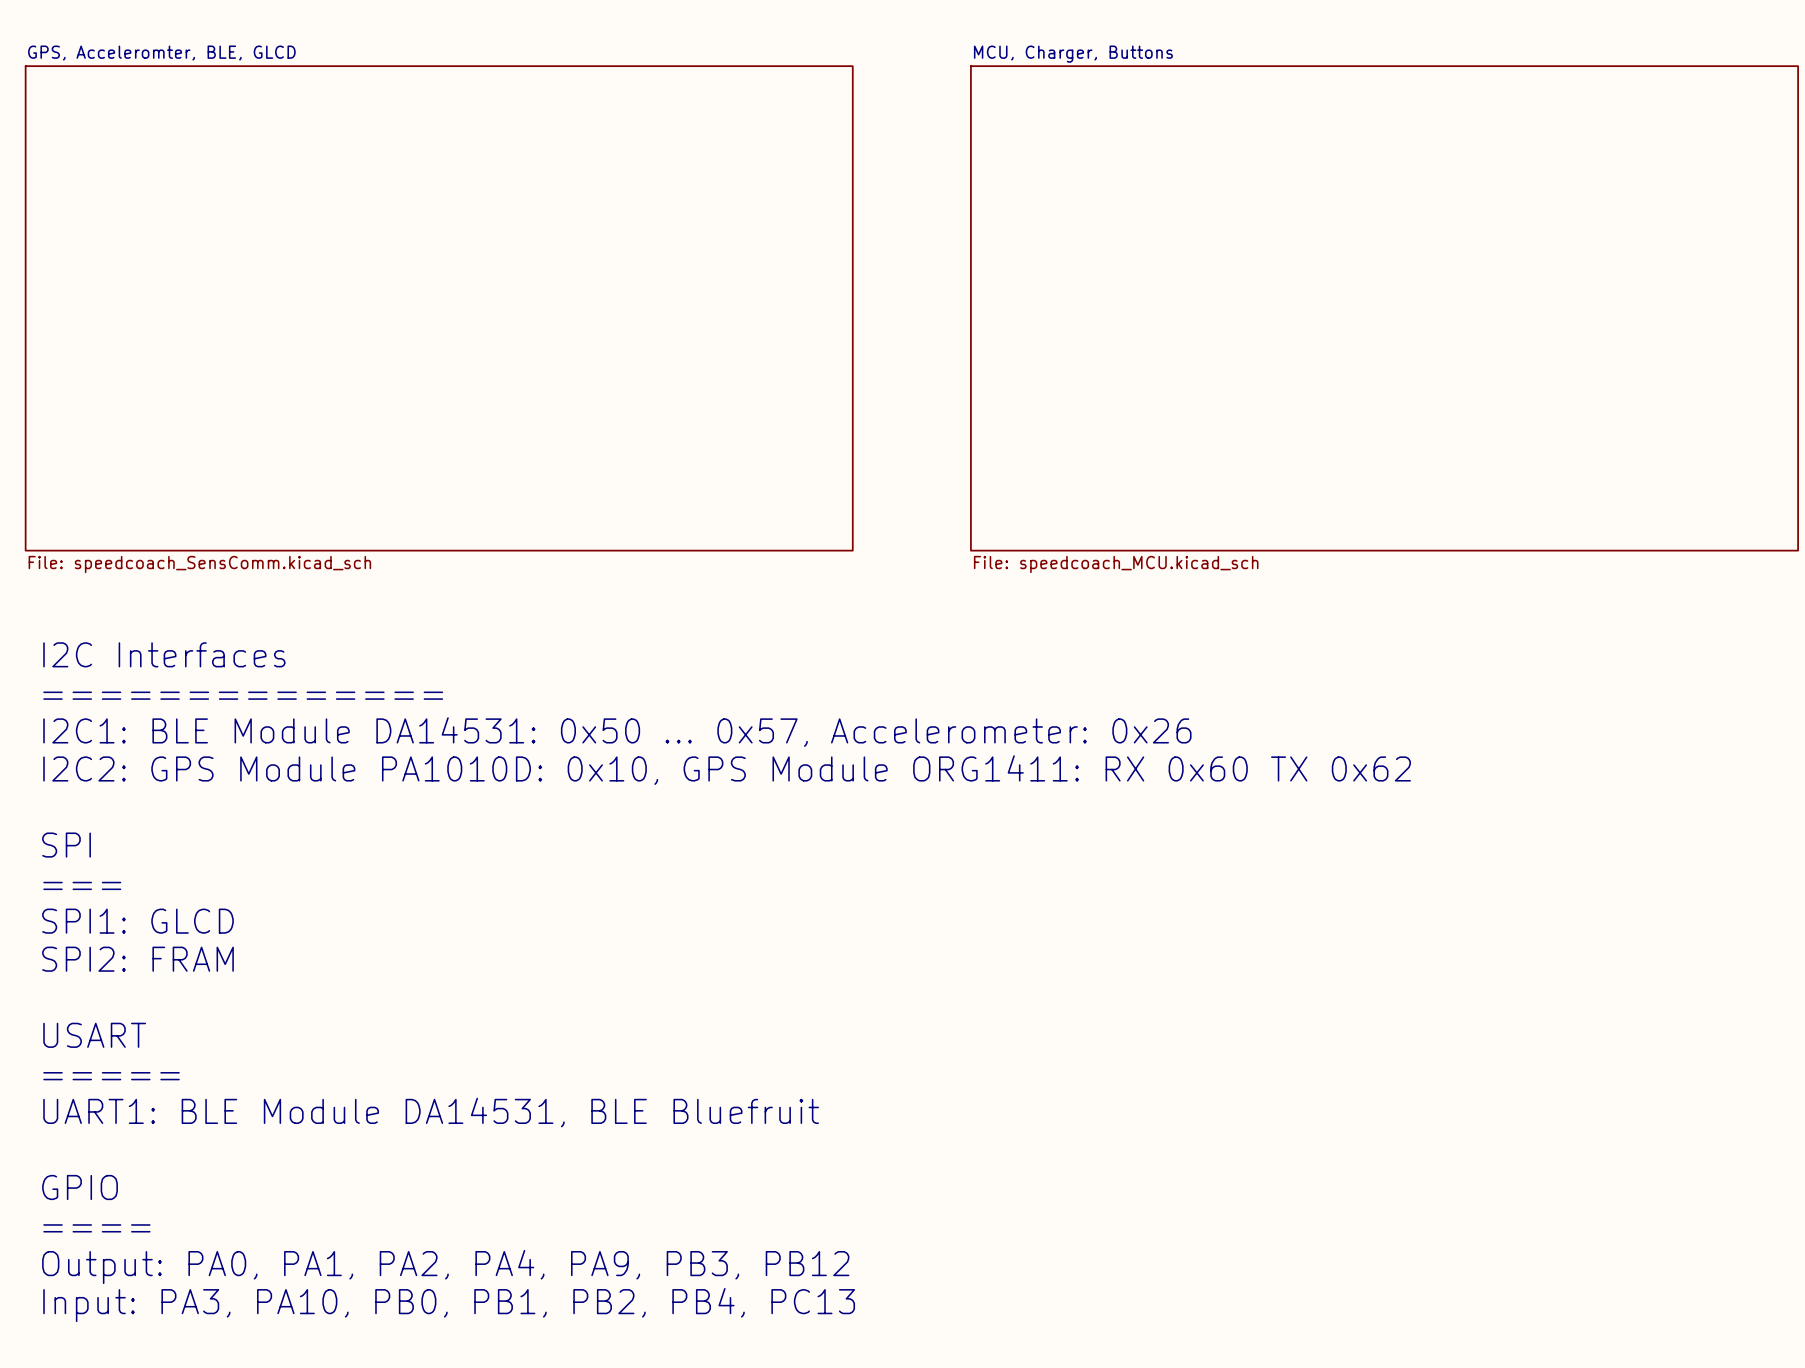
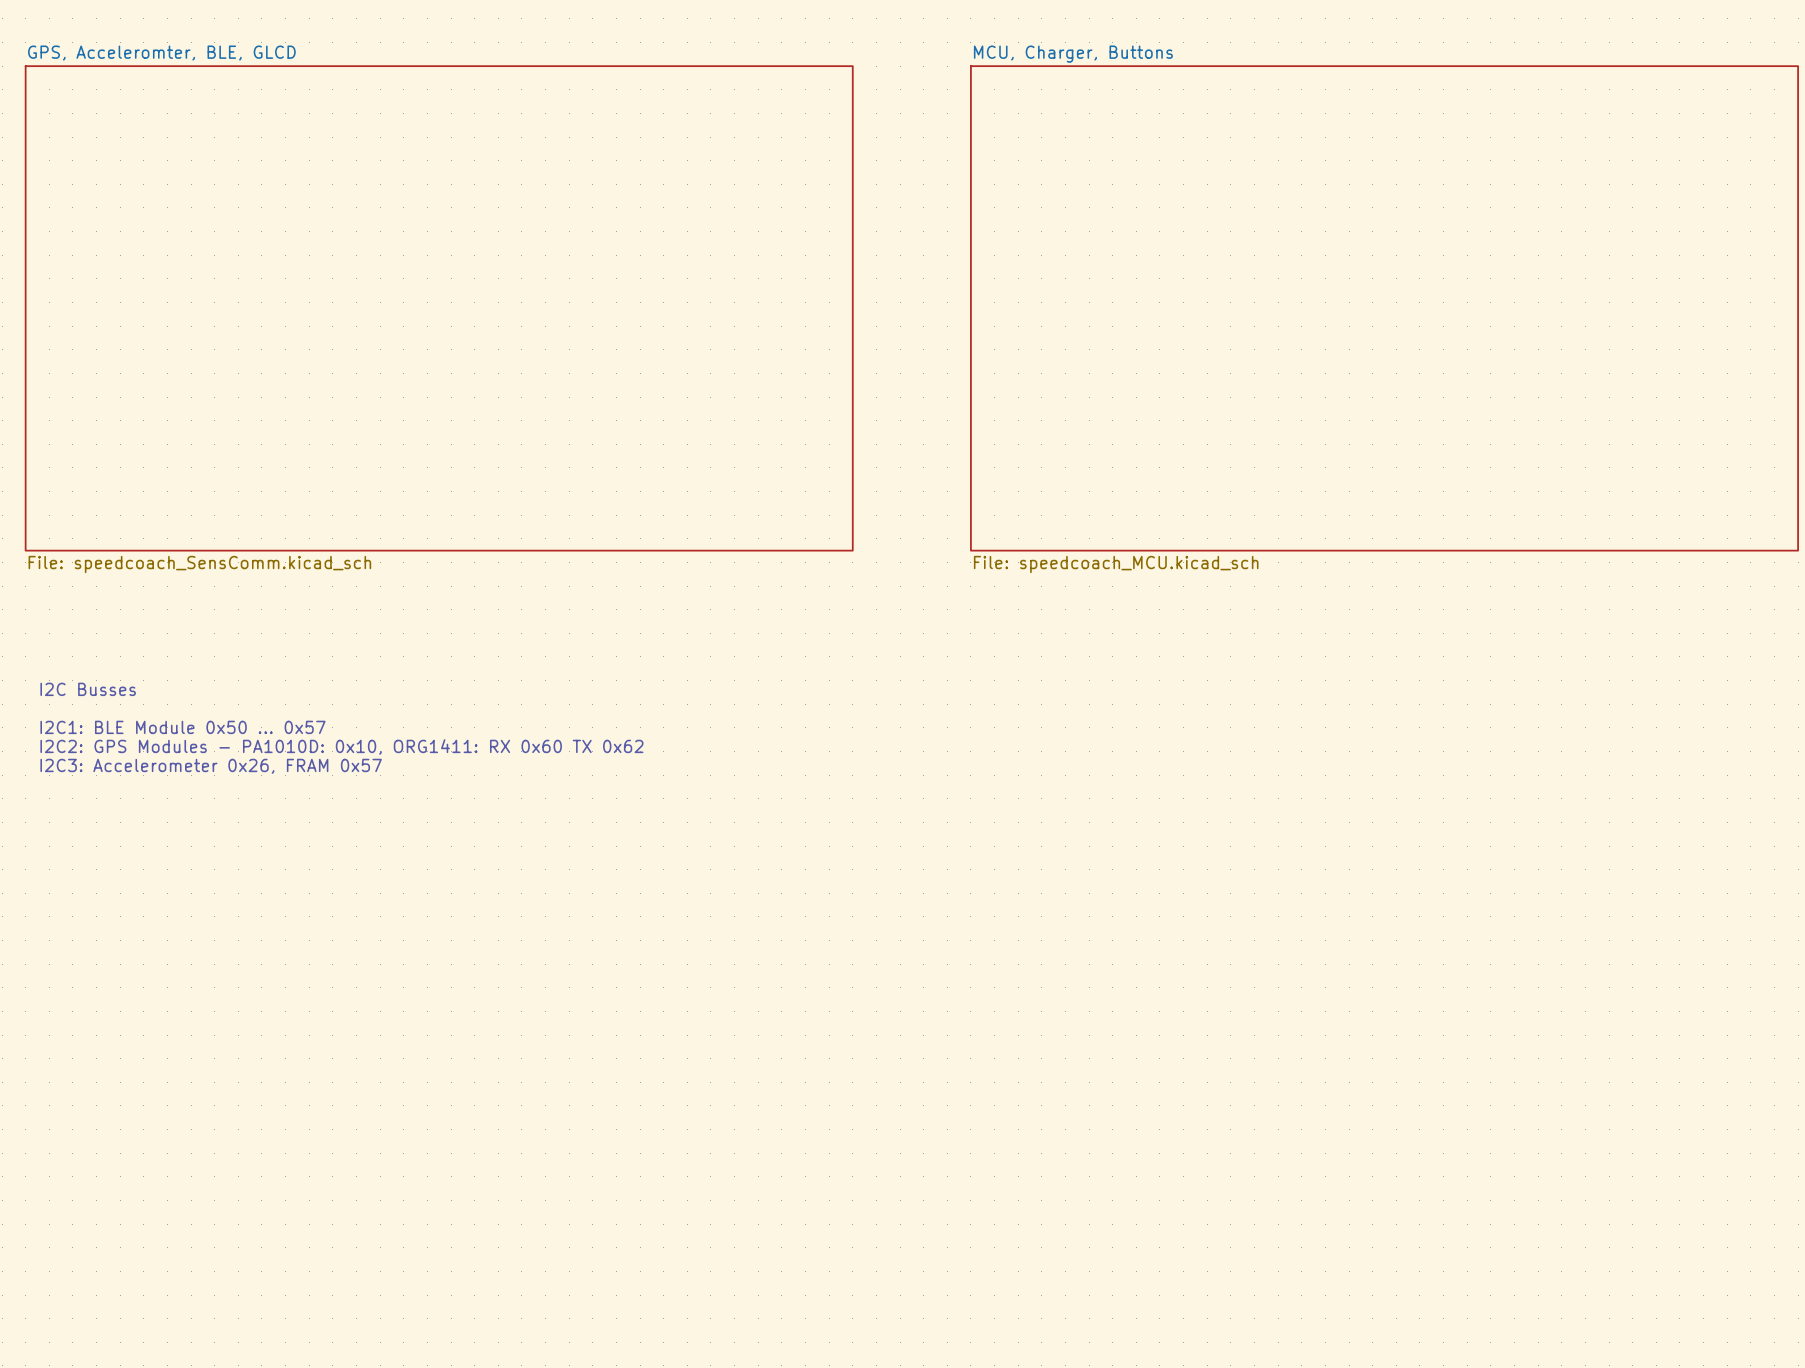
text: I2C Interfaces (164, 654) -> none
text: none -> I2C Busses (88, 689)
text: ============== (243, 695) -> none
text: I2C1: BLE Module DA14531: 0x50 ... 0x57, Accelerometer: 0x26 (617, 732) -> I2C1: BLE Module 0x50 ... 0x57 (182, 727)
text: none -> I2C3: Accelerometer 0x26, FRAM 0x57 (211, 766)
text: I2C2: GPS Module PA1010D: 0x10, GPS Module ORG1411: RX 0x60 TX 0x62 (727, 770) -> I2C2: GPS Modules - PA1010D: 0x10, ORG1411: RX 0x60 TX 0x62 (341, 746)
text: SPI (66, 845) -> none
text: === (82, 885) -> none
text: SPI1: GLCD (137, 921) -> none
text: SPI2: FRAM (137, 959) -> none
text: USART (94, 1035) -> none
text: ===== (111, 1076) -> none
text: UART1: BLE Module DA14531, BLE Bluefruit (431, 1112) -> none
text: GPIO (80, 1187) -> none
text: ==== (96, 1228) -> none
text: Output: PA0, PA1, PA2, PA4, PA9, PB3, PB12 (445, 1266) -> none
text: Input: PA3, PA10, PB0, PB1, PB2, PB4, PC13 (449, 1305) -> none

